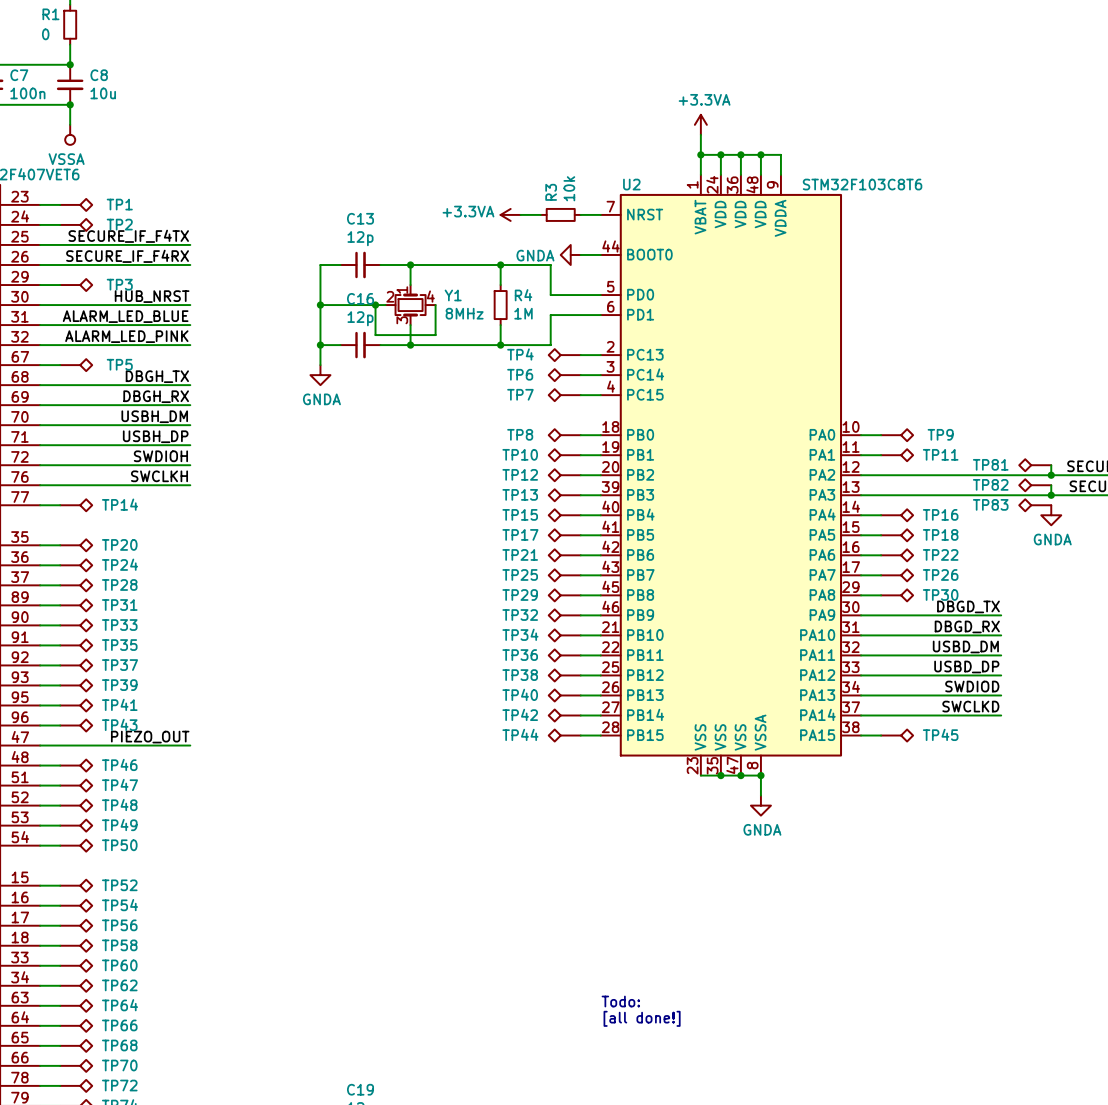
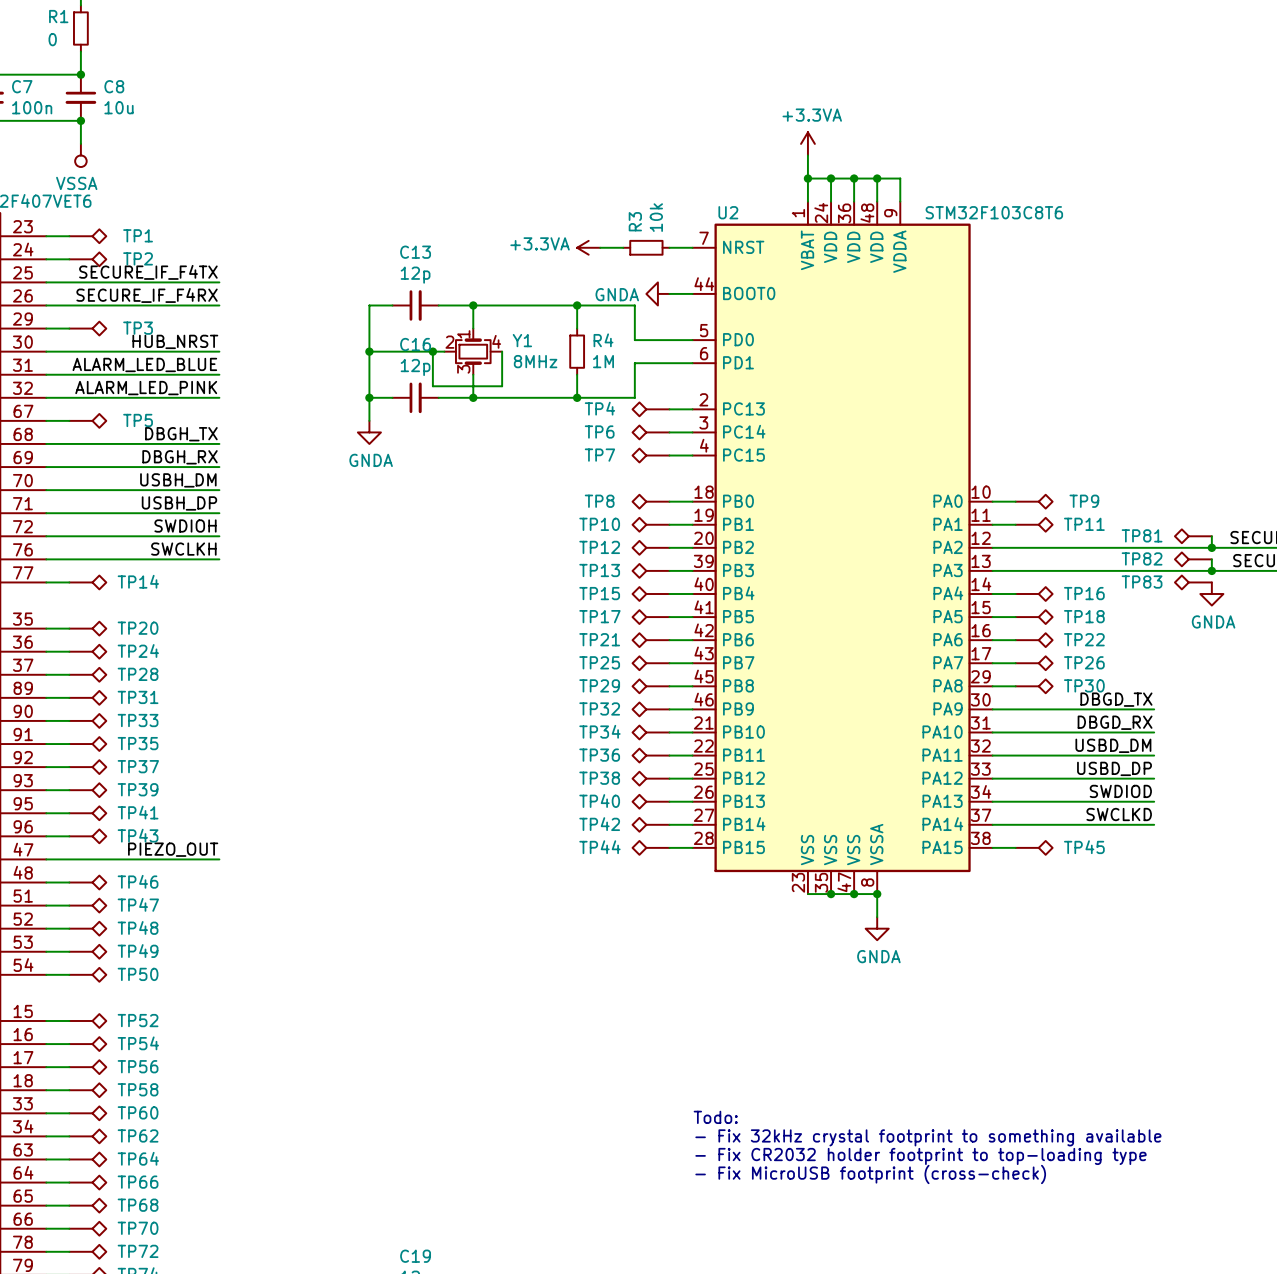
text: none -> Todo: (715, 1117)
text: none -> - Fix 32kHz crystal footprint to something available (928, 1137)
text: Todo: (620, 1001) -> - Fix CR2032 holder footprint to top-loading type (920, 1156)
text: [all done!] (642, 1018) -> - Fix MicroUSB footprint (cross-check) (870, 1174)

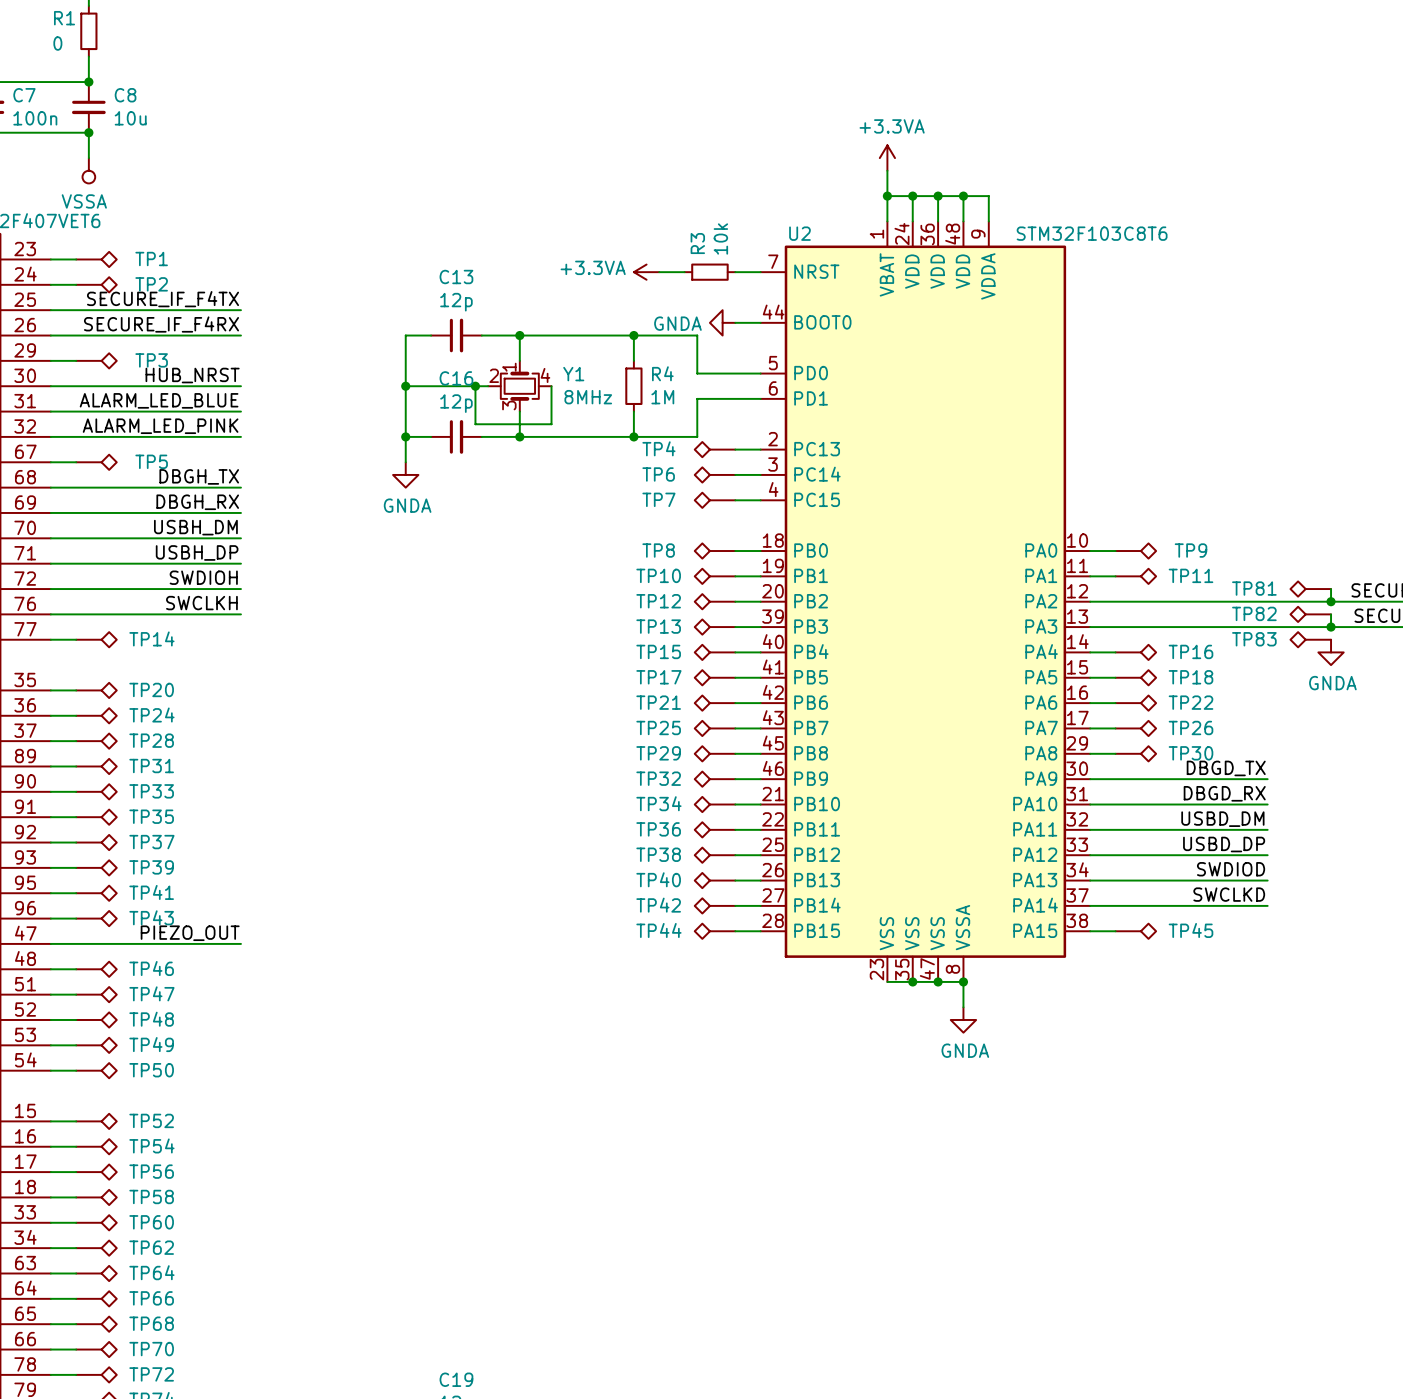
text: Todo: (715, 1117) -> none
text: - Fix 32kHz crystal footprint to something available (928, 1137) -> none
text: - Fix CR2032 holder footprint to top-loading type (920, 1156) -> none
text: - Fix MicroUSB footprint (cross-check) (870, 1174) -> none

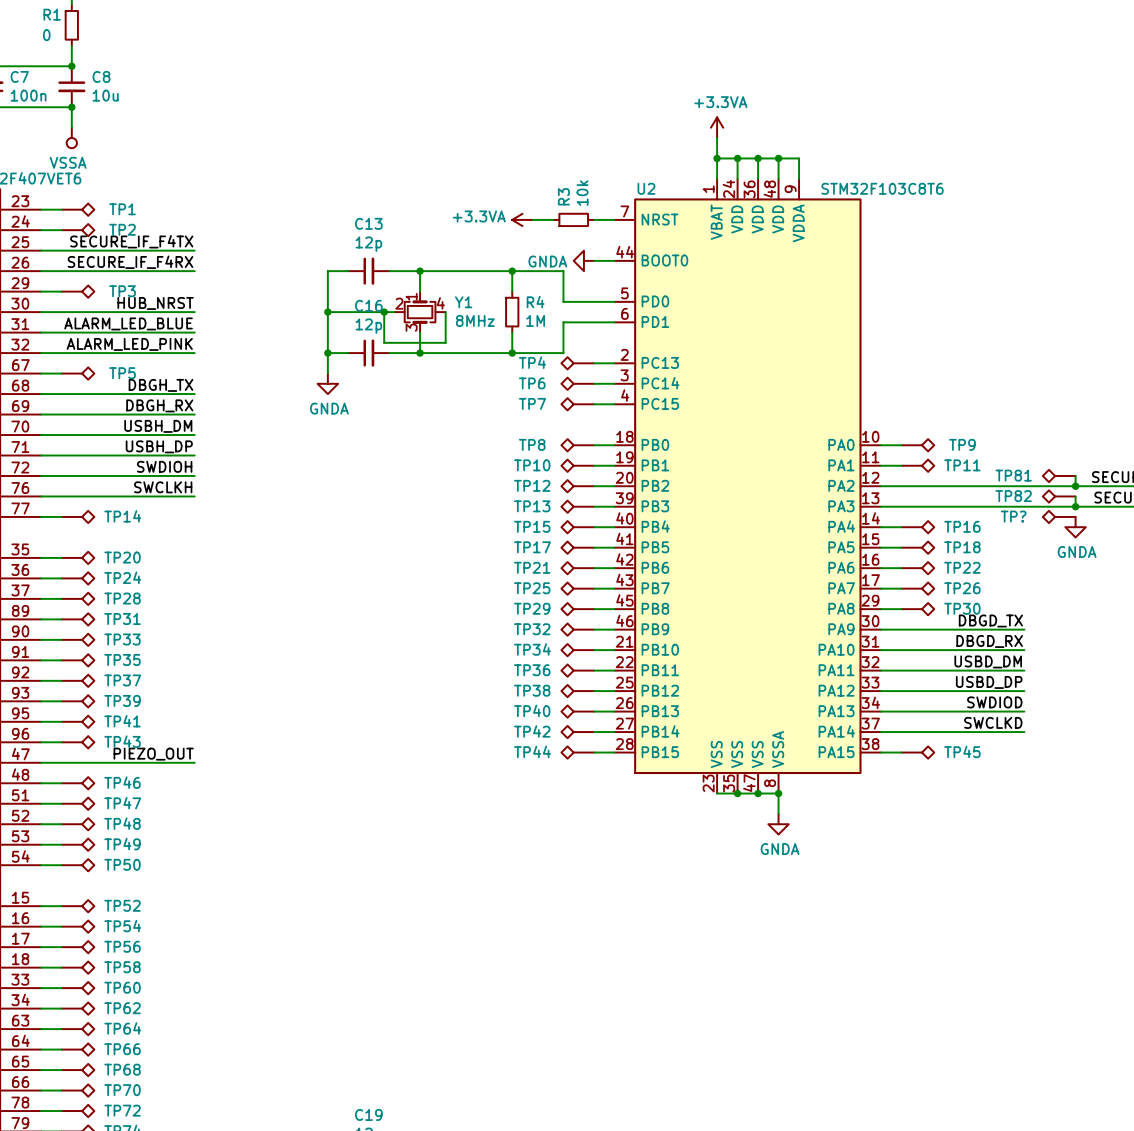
TP83 name: TP83 (1254, 639) -> TP? (1013, 516)

